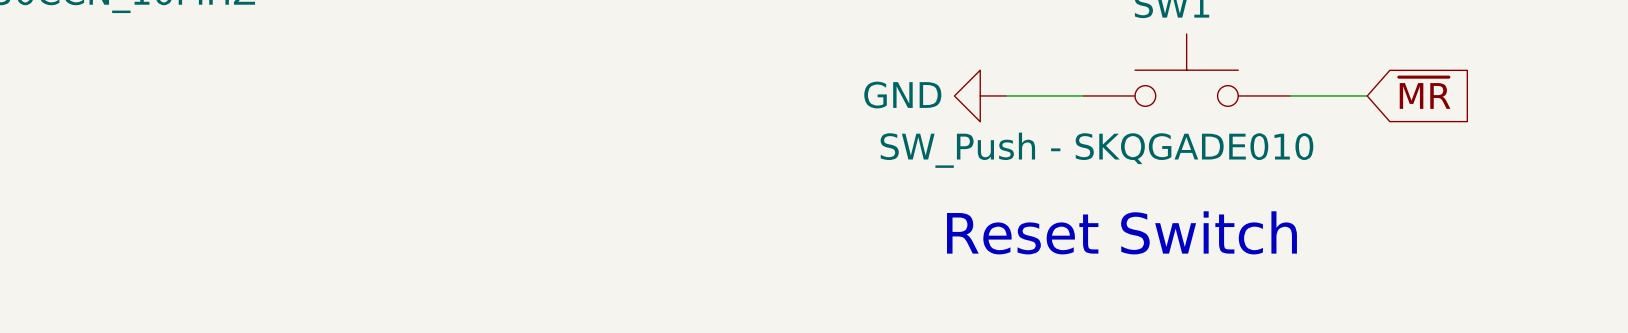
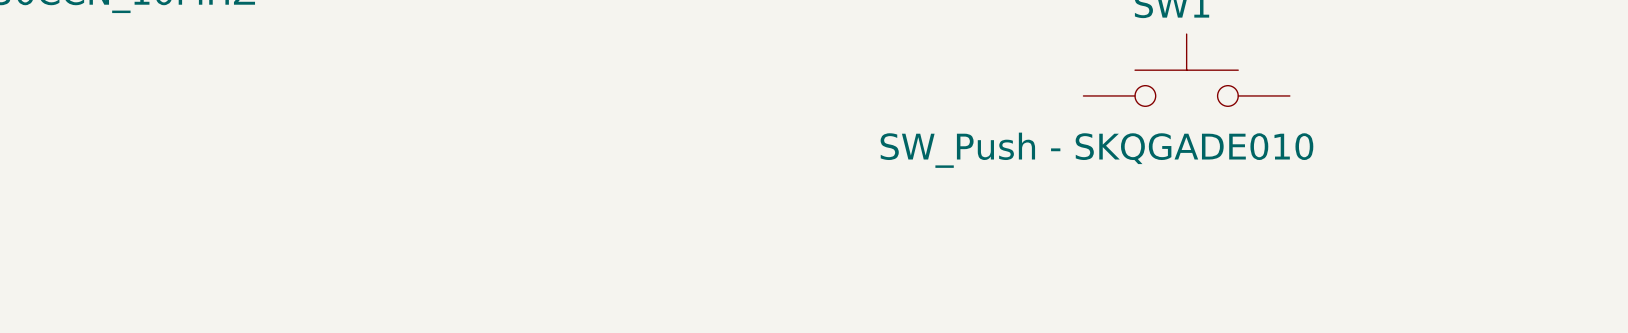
global label: ~{MR} (1424, 93) -> none
power symbol: GND (980, 95) -> none
wire: (1006, 95) (1083, 95) -> none
wire: (1289, 95) (1367, 95) -> none
text: Reset Switch (1121, 232) -> none

